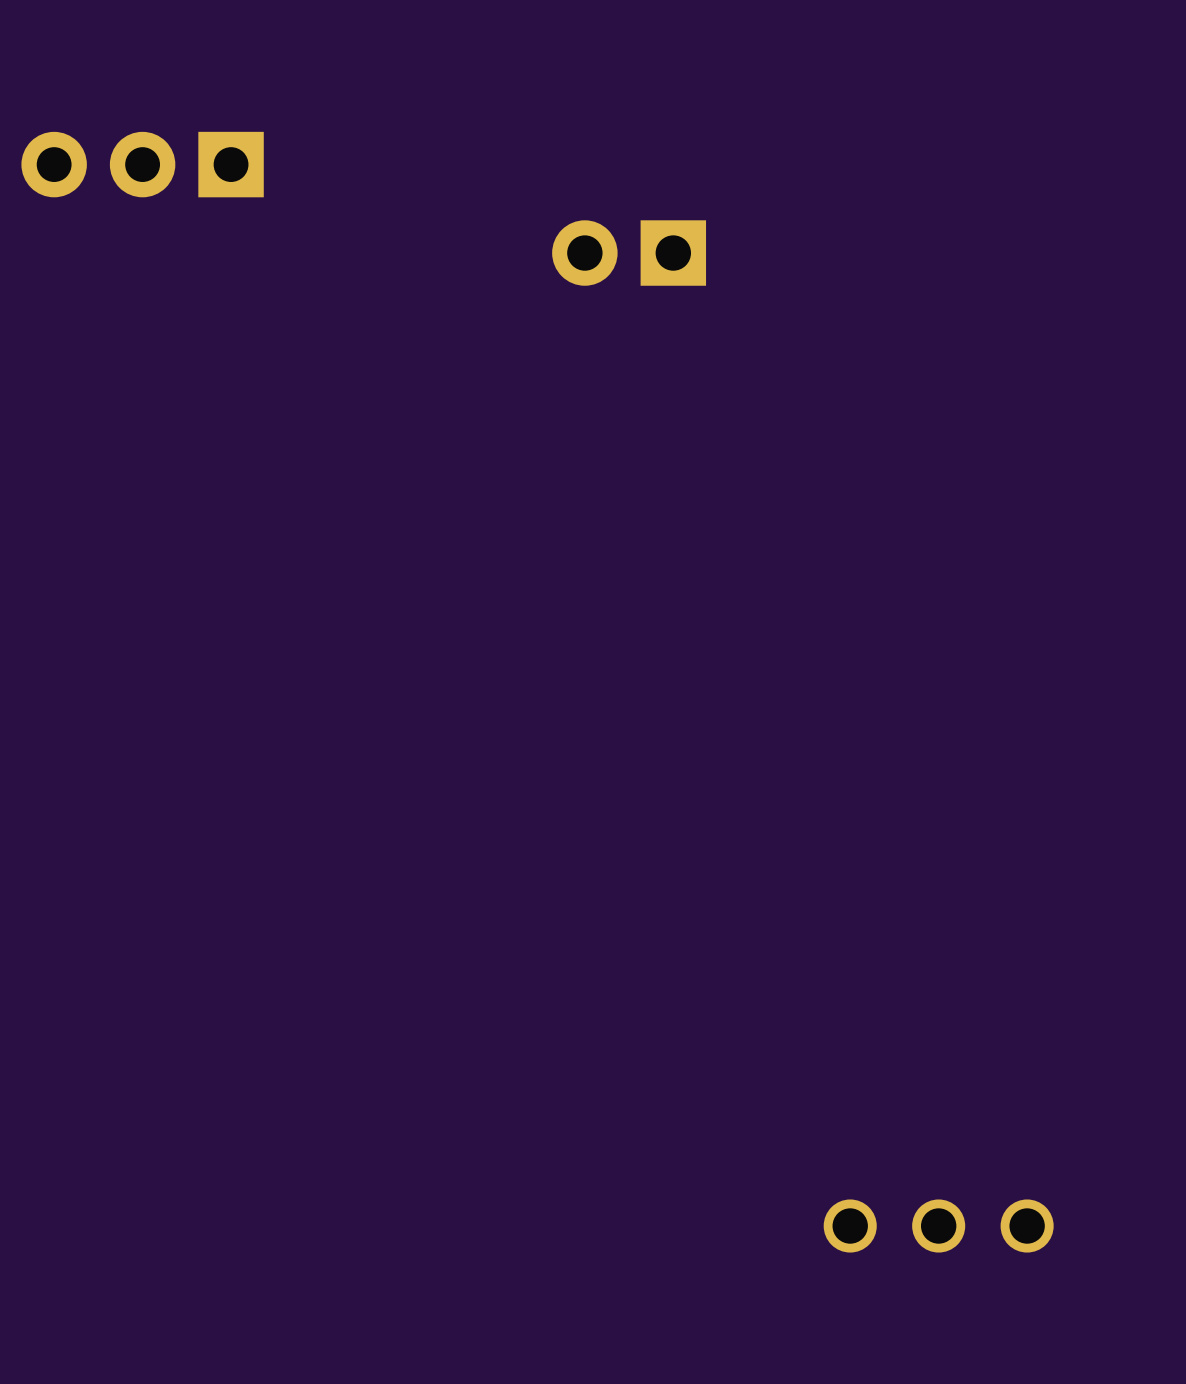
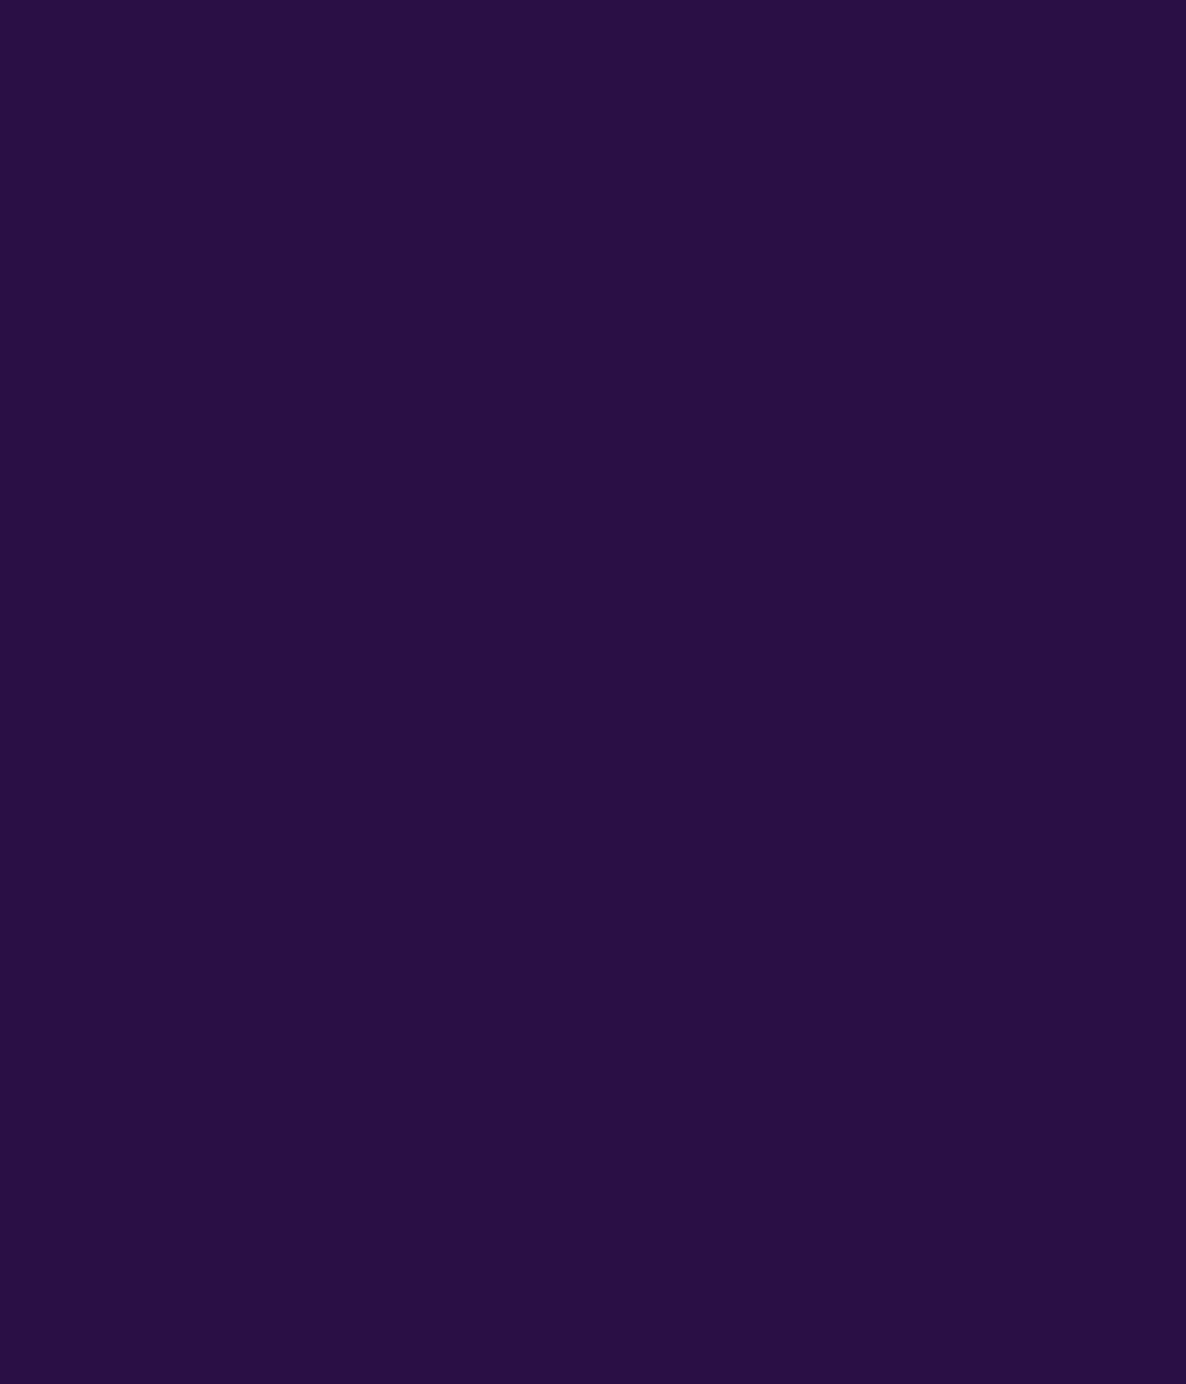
part: (142, 164) -> none
part: (629, 253) -> none
part: (938, 1226) -> none

